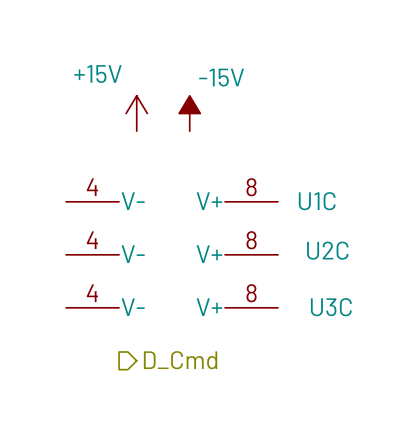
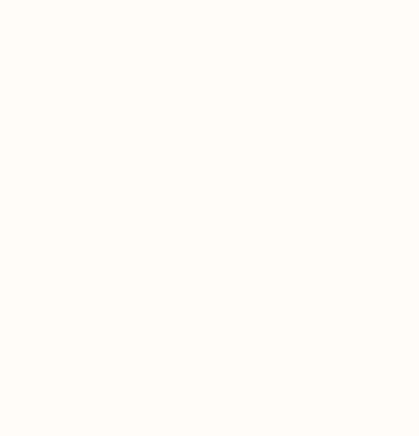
power symbol: +15V (136, 113) -> none
power symbol: -15V (189, 113) -> none
U1C: (172, 201) -> none
U2C: (172, 254) -> none
U3C: (172, 307) -> none
hierarchical label: D_Cmd (180, 360) -> none

